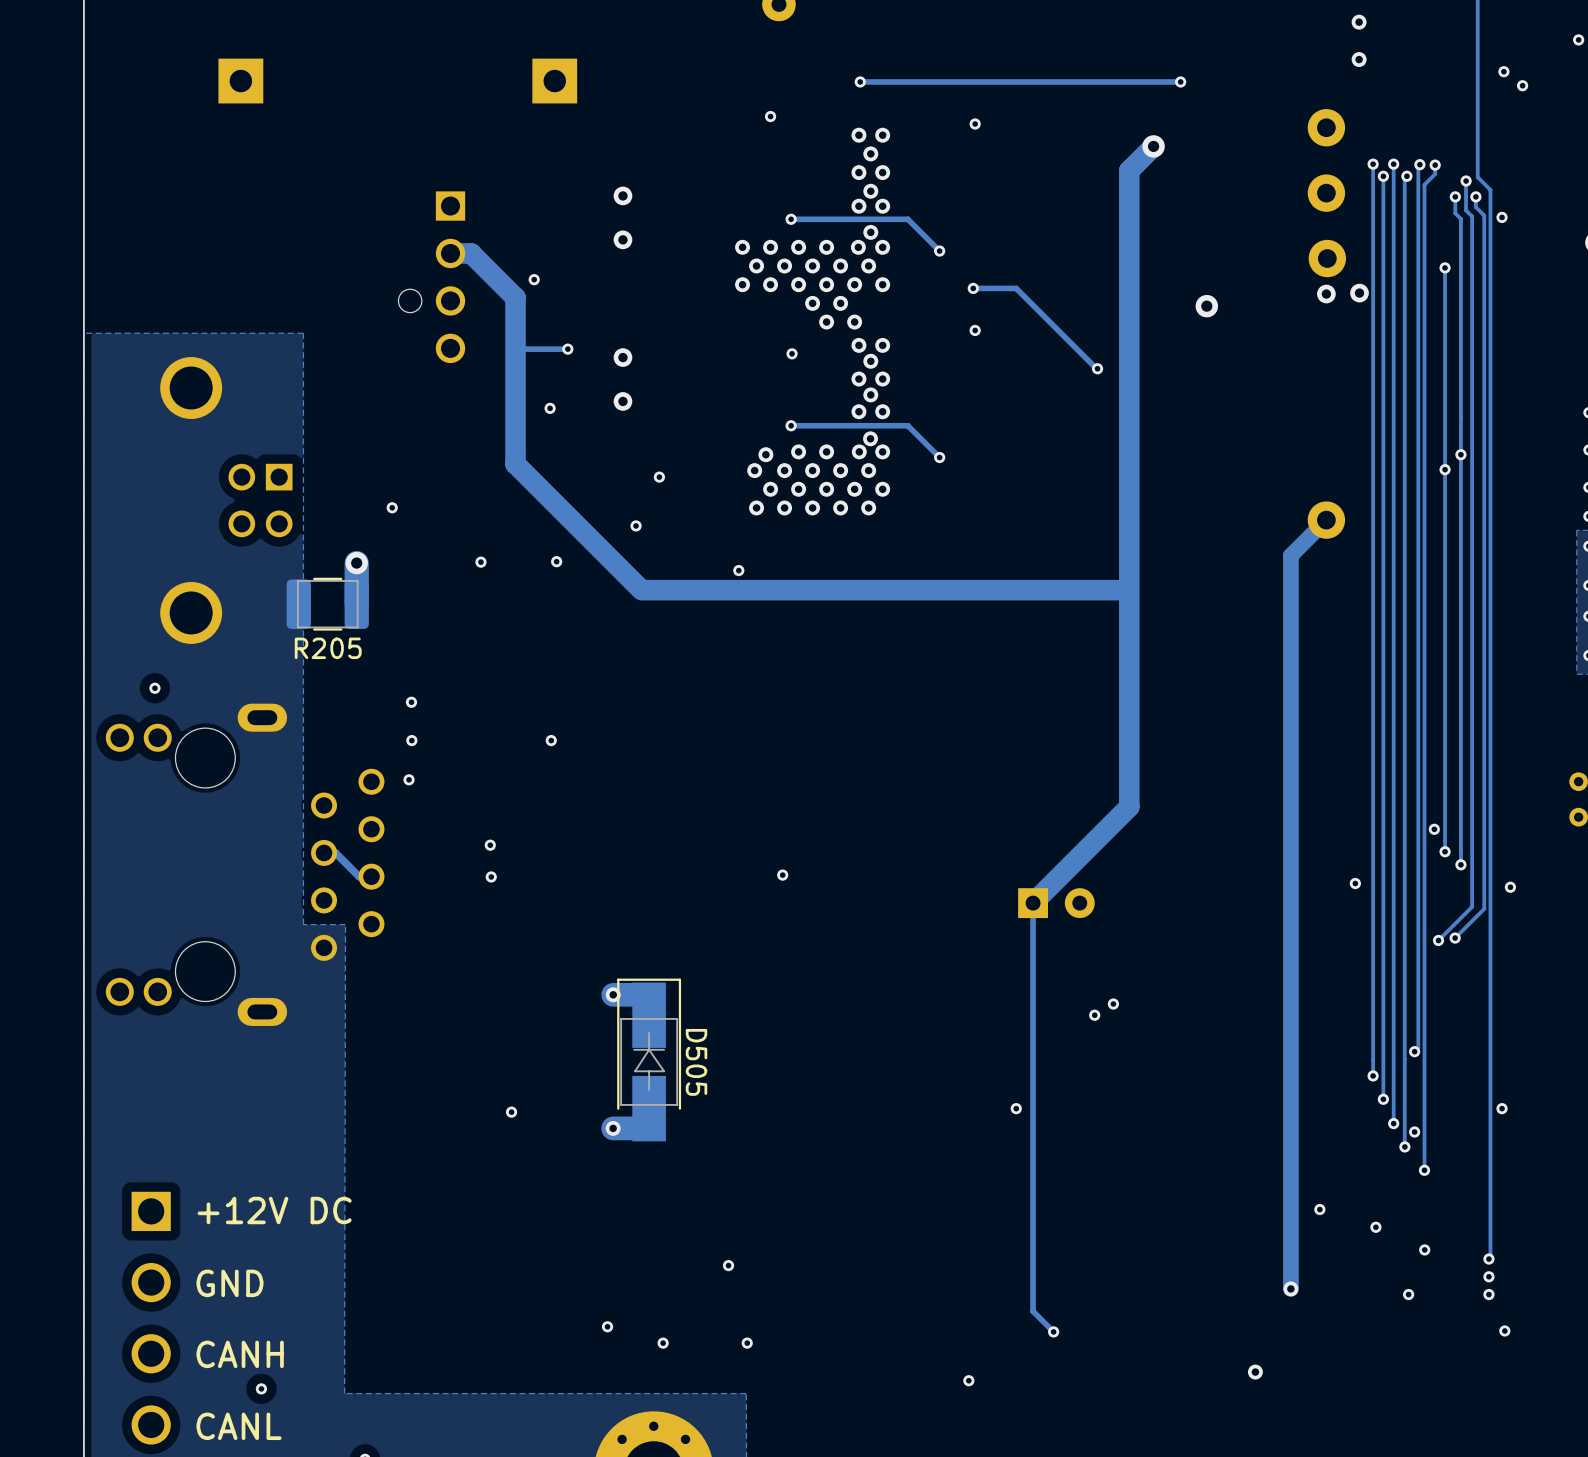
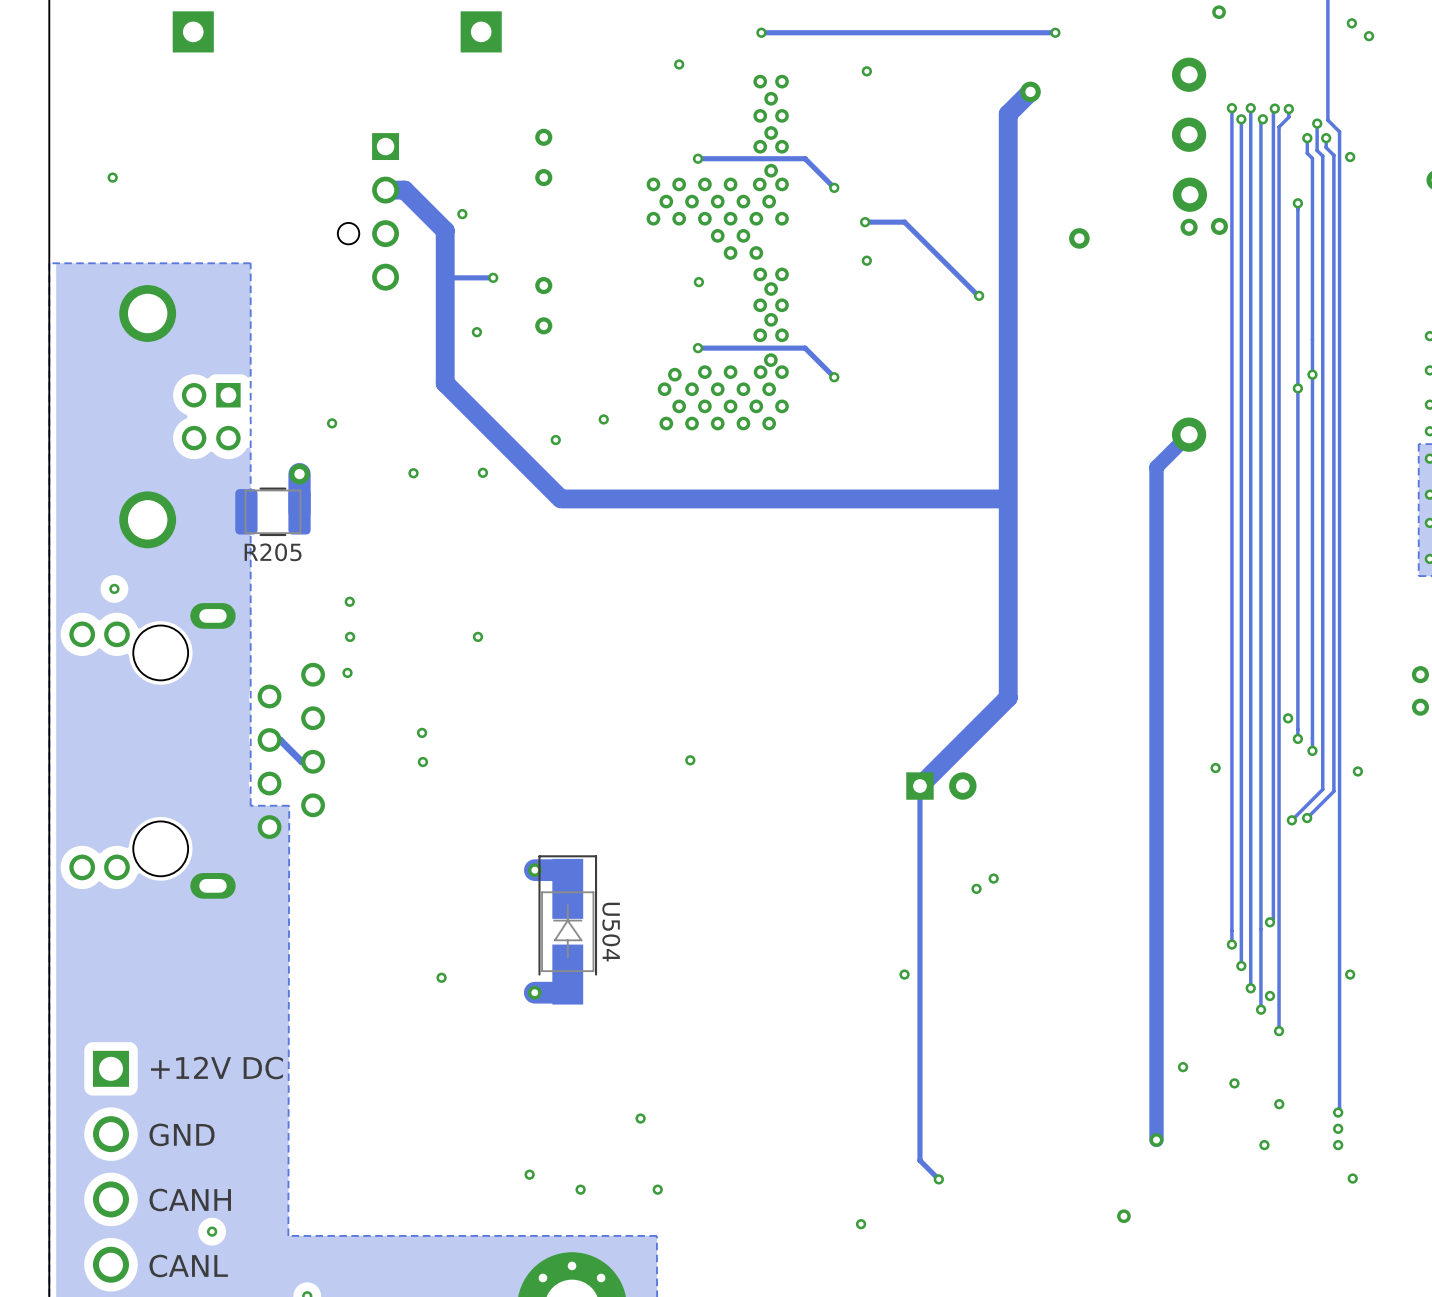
via: none -> (112, 177)
via position: (659, 477) -> (603, 419)
via: (738, 570) -> none
D505 name: D505 (696, 1062) -> U504 (611, 932)

